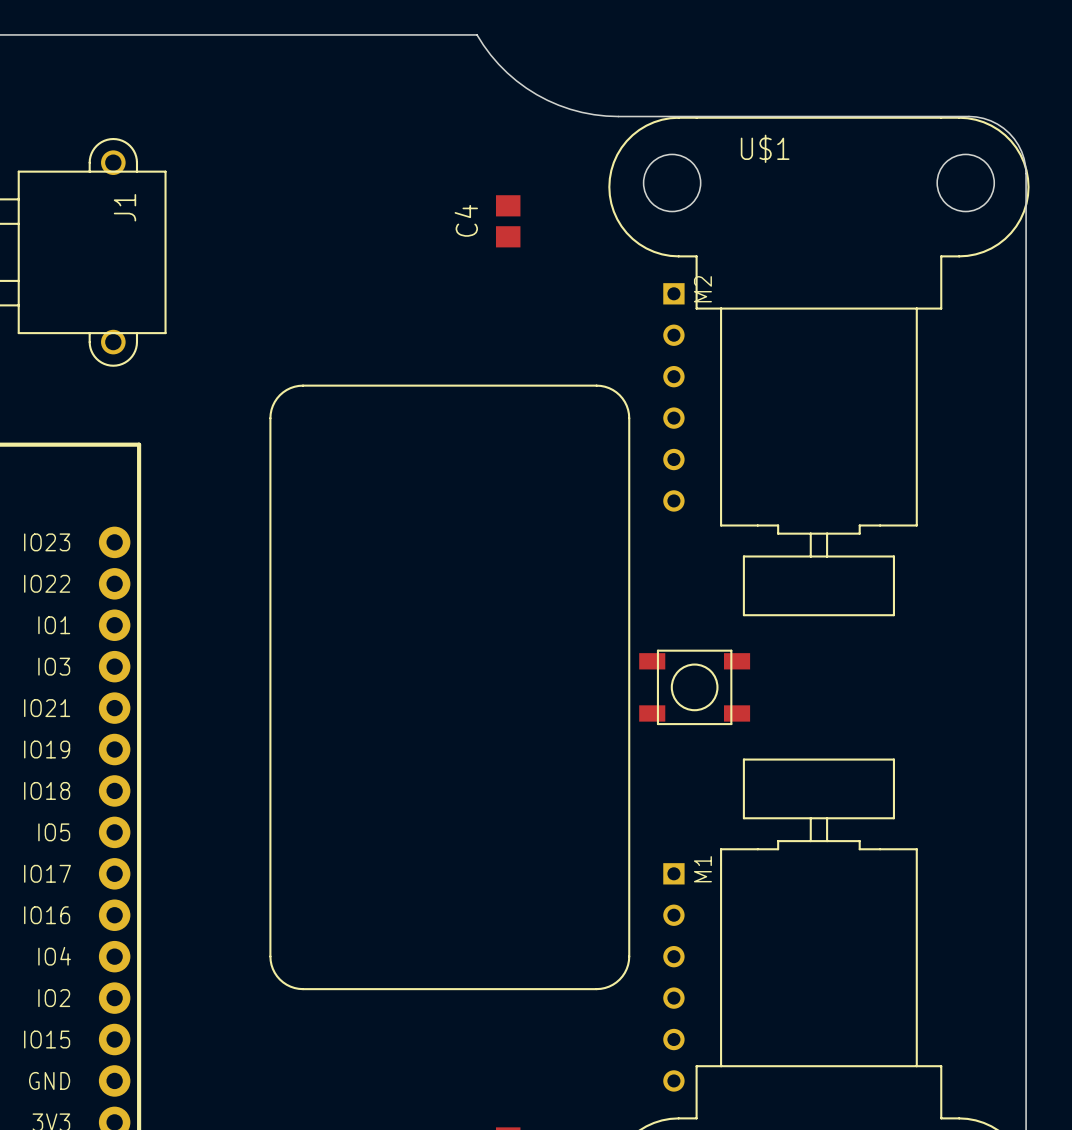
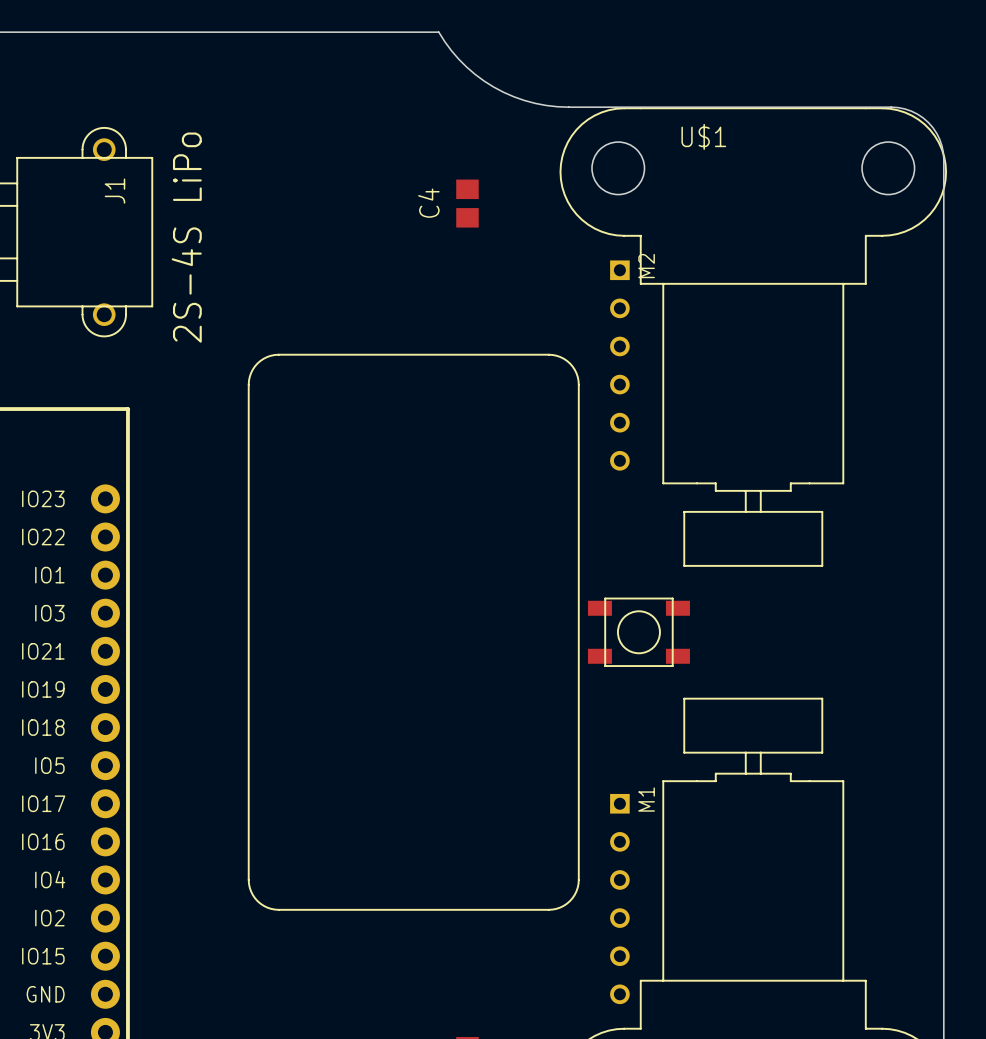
text: none -> 2S-4S LiPo (186, 237)

